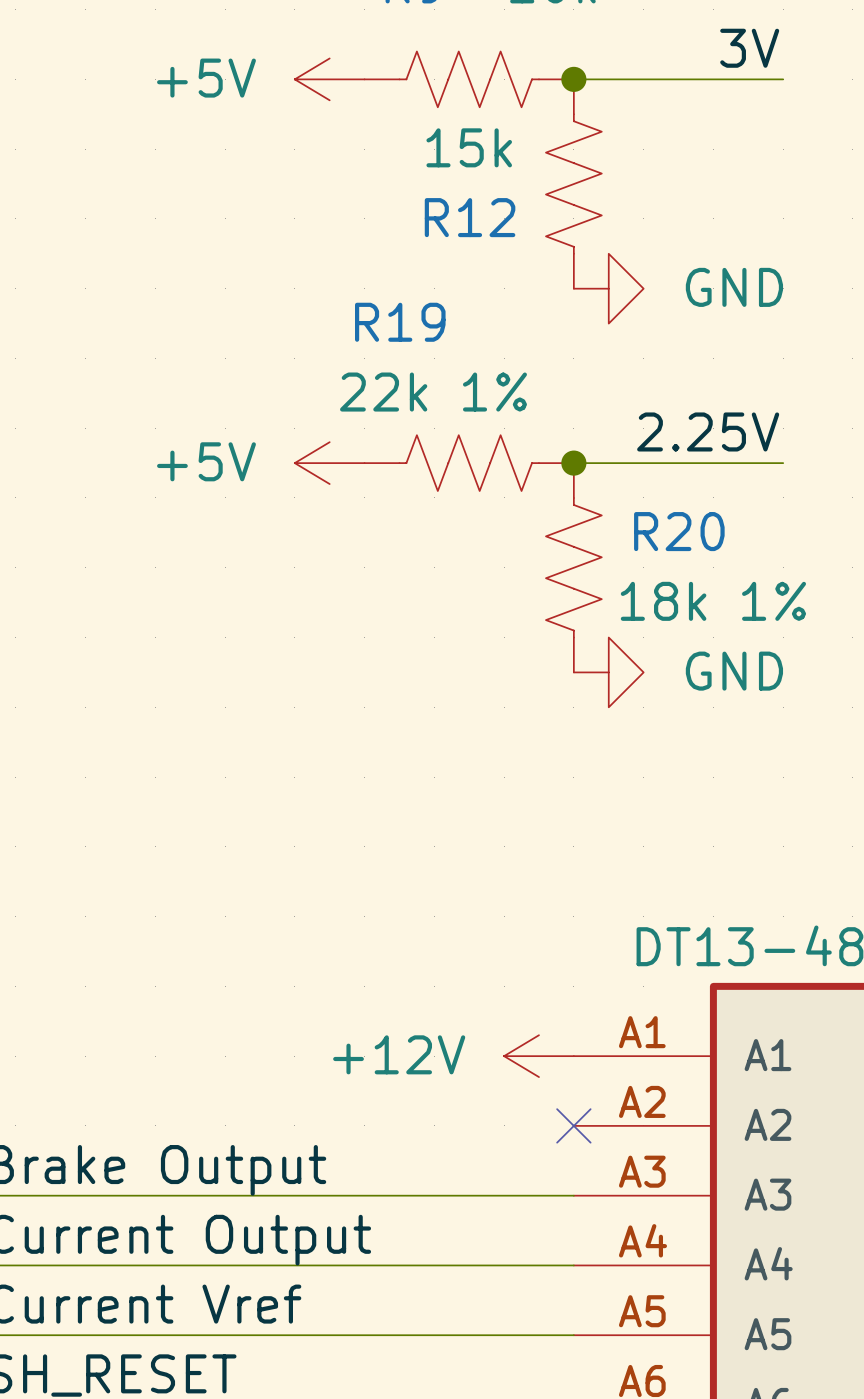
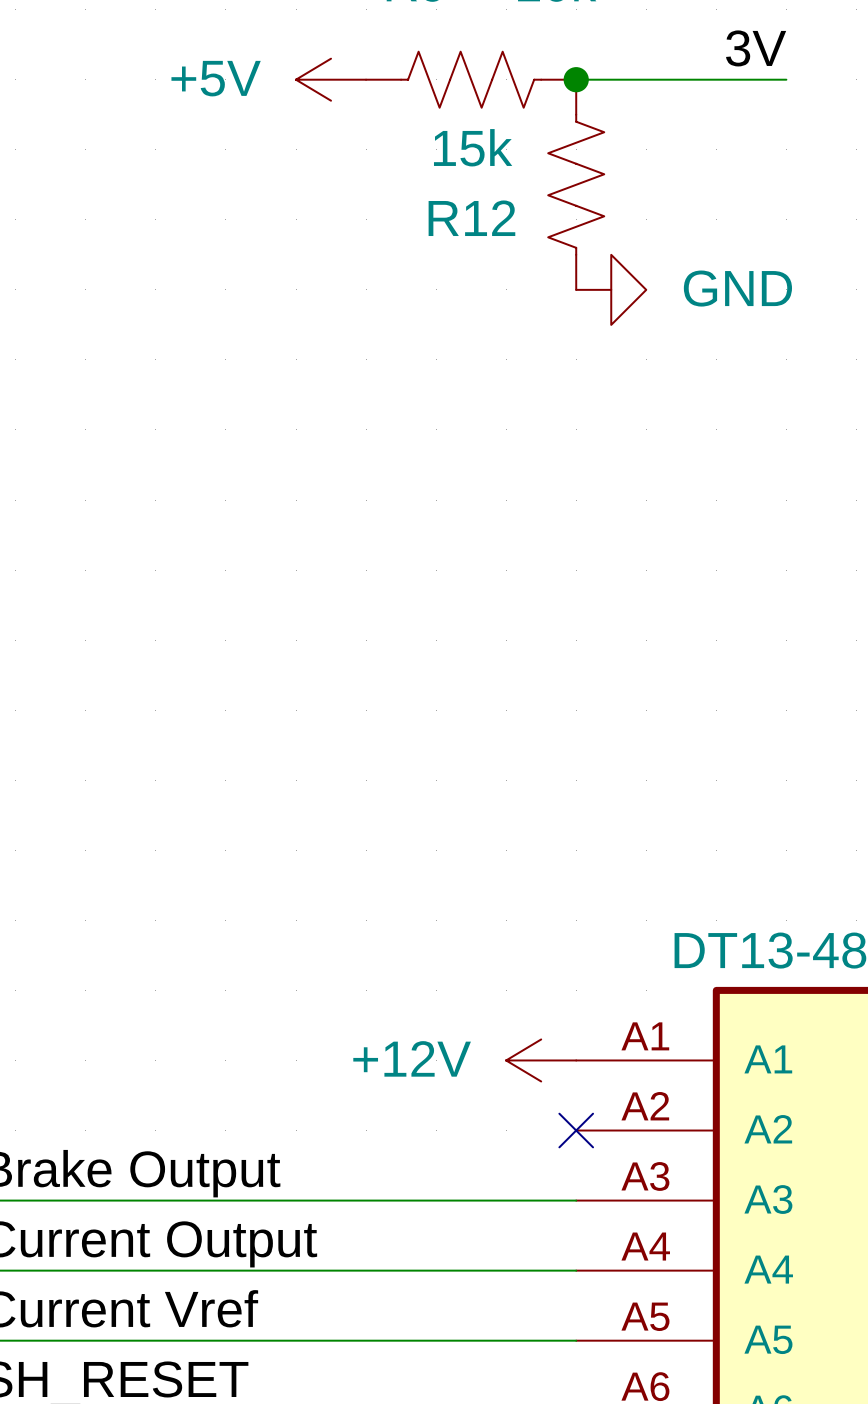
label: 2.25V (708, 431) -> none
power symbol: +5V (329, 463) -> none
R19: 22k 1% (469, 463) -> none
wire: (573, 463) (783, 463) -> none
junction: (573, 463) -> none
R20: 18k 1% (573, 567) -> none
power symbol: GND (608, 672) -> none

